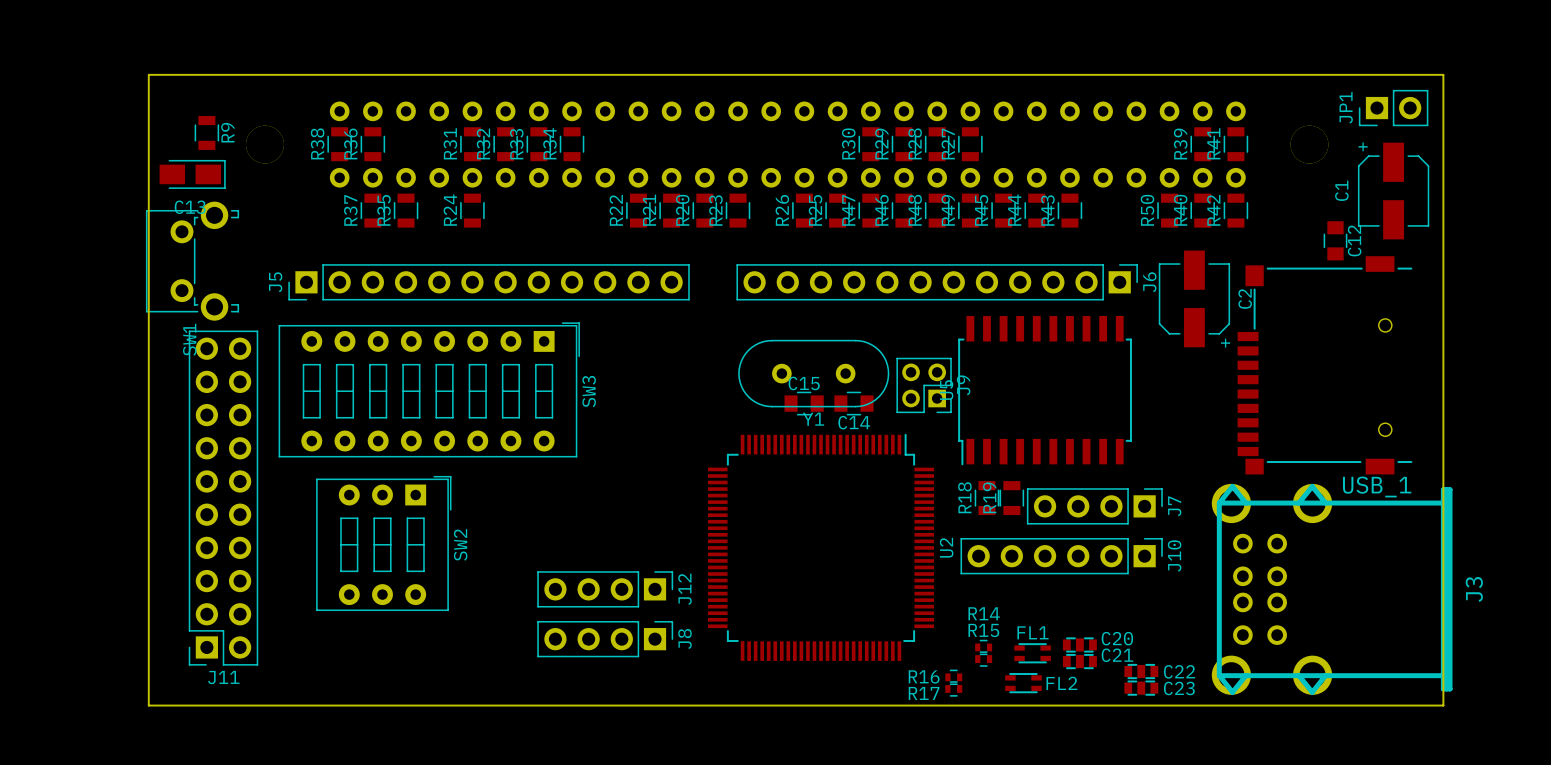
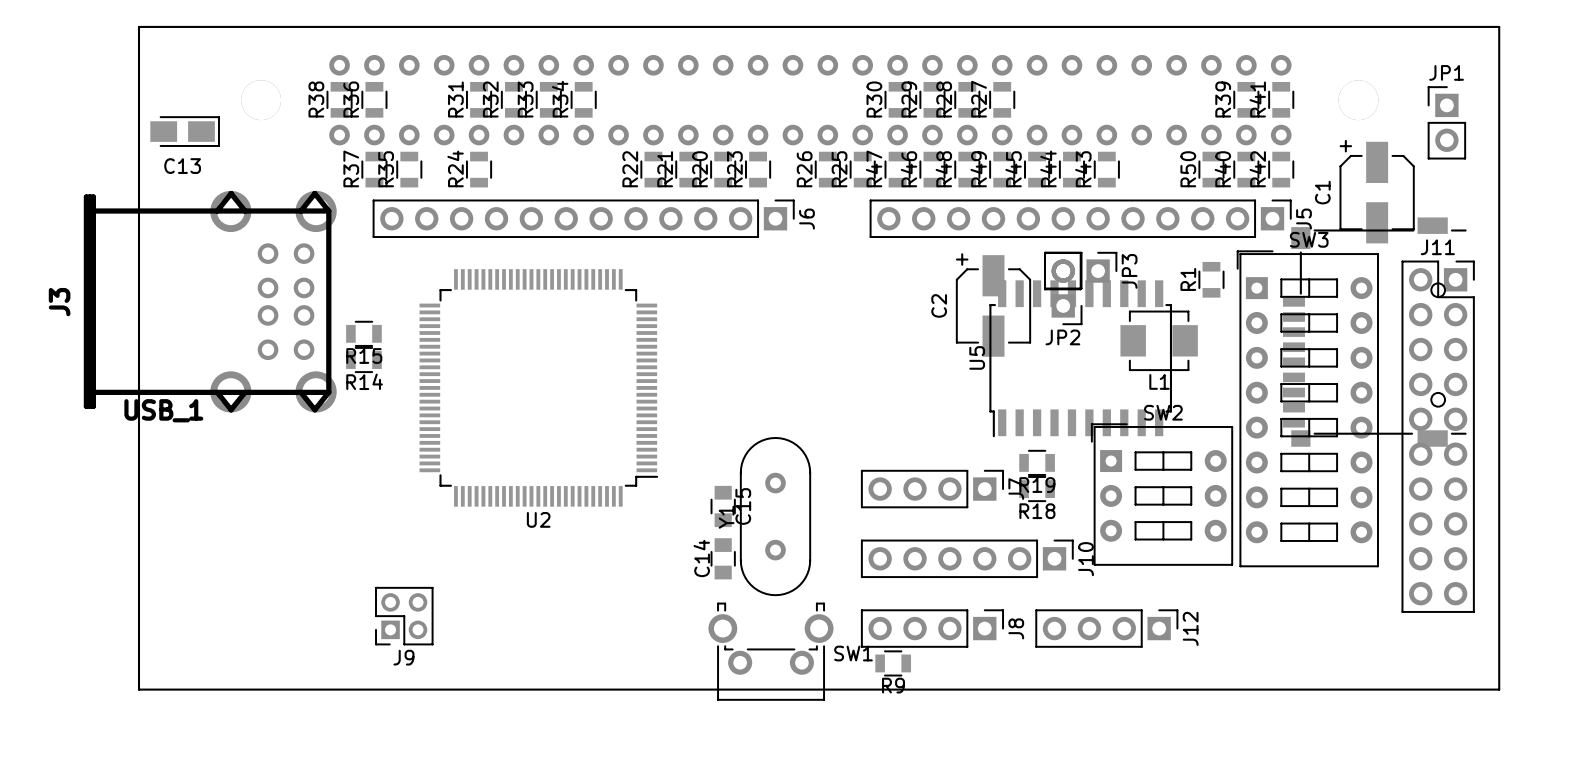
JP1 rotation: 0° (1393, 108) -> 90° clockwise (1446, 122)
JP1 position: (1393, 108) -> (1446, 122)
R9 rotation: 0° (206, 132) -> 90° clockwise (893, 663)
R9 position: (206, 132) -> (893, 663)
C1 position: (1393, 191) -> (1377, 192)
C12: (1335, 240) -> none
SW1 rotation: 0° (192, 261) -> 90° counterclockwise (770, 651)
SW1 position: (192, 261) -> (770, 651)
J5 rotation: 0° (489, 282) -> 180° (1080, 218)
J5 position: (489, 282) -> (1080, 218)
J6 position: (937, 282) -> (583, 218)
C2 rotation: 0° (1194, 298) -> 180° (993, 305)
C2 position: (1194, 298) -> (993, 305)
JP3: none -> (1080, 271)
R1: none -> (1211, 279)
JP2: none -> (1063, 288)
Y1 rotation: 0° (813, 373) -> 90° clockwise (775, 516)
Y1 position: (813, 373) -> (775, 516)
L1: none -> (1159, 340)
J9 rotation: 0° (924, 385) -> 90° clockwise (404, 616)
J9 position: (924, 385) -> (404, 616)
SW3 rotation: 0° (429, 389) -> 90° counterclockwise (1307, 408)
SW3 position: (429, 389) -> (1307, 408)
C15 rotation: 0° (804, 403) -> 90° clockwise (723, 506)
C15 position: (804, 403) -> (723, 506)
C14 rotation: 0° (853, 403) -> 90° clockwise (723, 558)
C14 position: (853, 403) -> (723, 558)
R18 name position: R18 (964, 497) -> R18 (1037, 511)
R19 name position: R19 (989, 497) -> R19 (1037, 485)
J11 rotation: 0° (223, 498) -> 180° (1438, 436)
J11 position: (223, 498) -> (1438, 436)
R18 rotation: 0° (986, 498) -> 90° clockwise (1037, 489)
R18 position: (986, 498) -> (1037, 489)
R19 rotation: 0° (1011, 498) -> 90° clockwise (1037, 462)
J7 position: (1094, 506) -> (932, 489)
SW2 rotation: 0° (383, 543) -> 90° counterclockwise (1162, 494)
SW2 position: (383, 543) -> (1162, 494)
U2 rotation: 0° (820, 547) -> 90° clockwise (538, 387)
U2 position: (820, 547) -> (538, 387)
J10 position: (1061, 556) -> (967, 558)
J12 position: (605, 589) -> (1106, 628)
J3 rotation: 0° (1332, 589) -> 180° (210, 301)
J3 position: (1332, 589) -> (210, 301)
R14 name position: R14 (984, 613) -> R14 (364, 381)
R15 name position: R15 (983, 630) -> R15 (364, 355)
J8 position: (605, 639) -> (932, 628)
R14 footprint: [975, 639, 993, 656] -> [346, 347, 382, 373]
C20: (1079, 644) -> none
R15 footprint: [975, 651, 993, 667] -> [346, 320, 382, 347]
FL1: (1032, 653) -> none
C21: (1079, 661) -> none
C22: (1141, 671) -> none
R16: (953, 677) -> none
FL2: (1023, 683) -> none
R17: (953, 688) -> none
C23: (1141, 688) -> none

